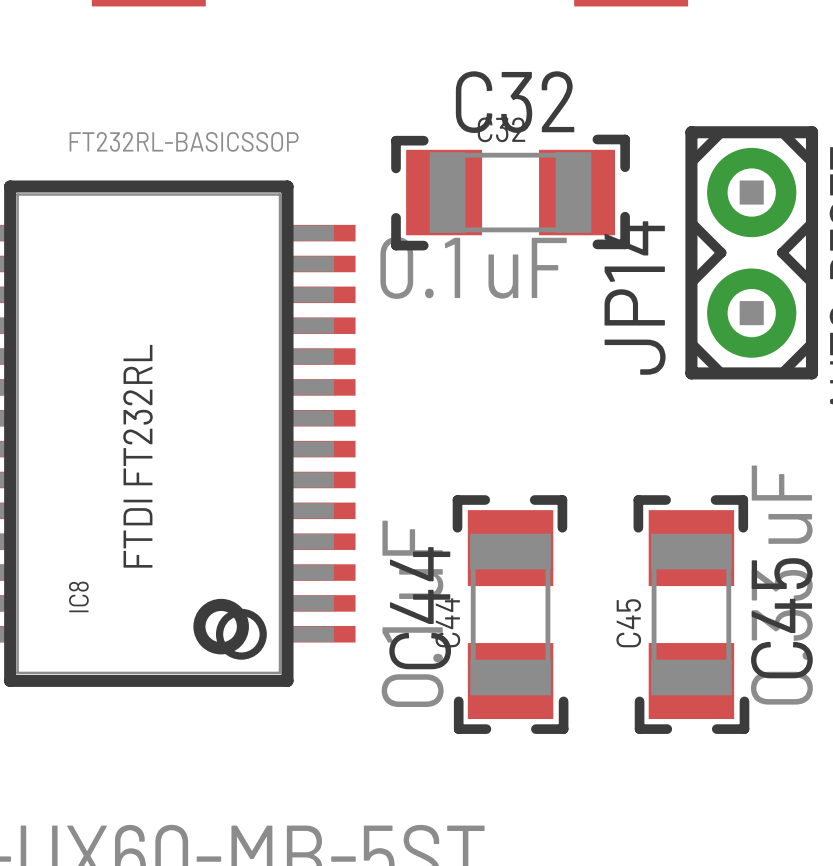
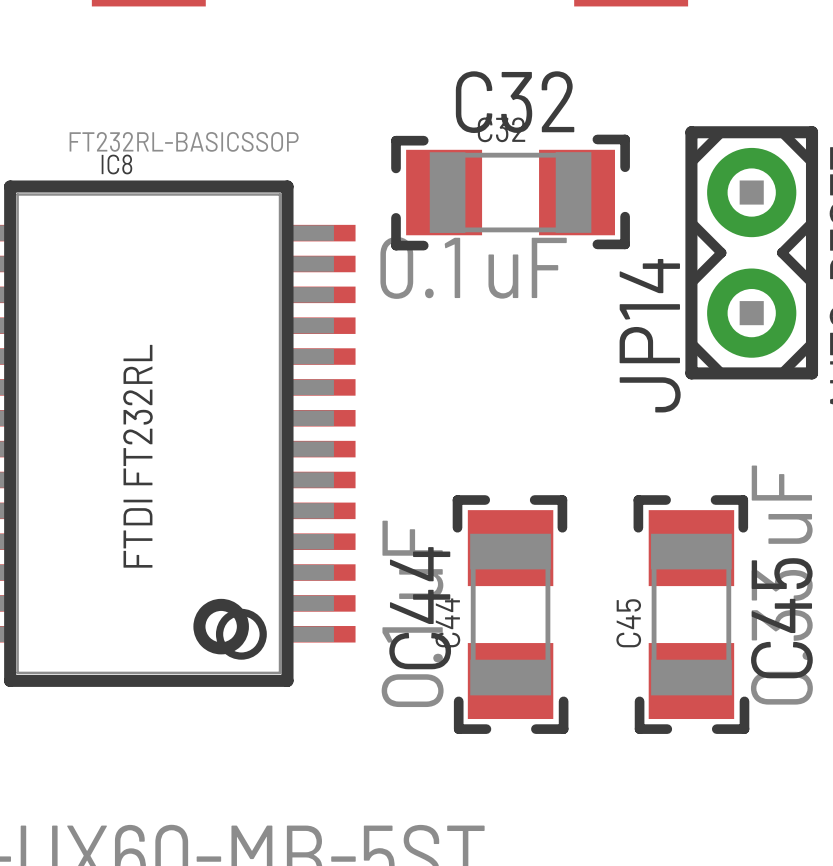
JP14 name position: JP14 (635, 298) -> JP14 (650, 335)
IC8 name rotation: 0° (78, 596) -> 90° clockwise (116, 164)
IC8 name position: IC8 (78, 596) -> IC8 (116, 164)

